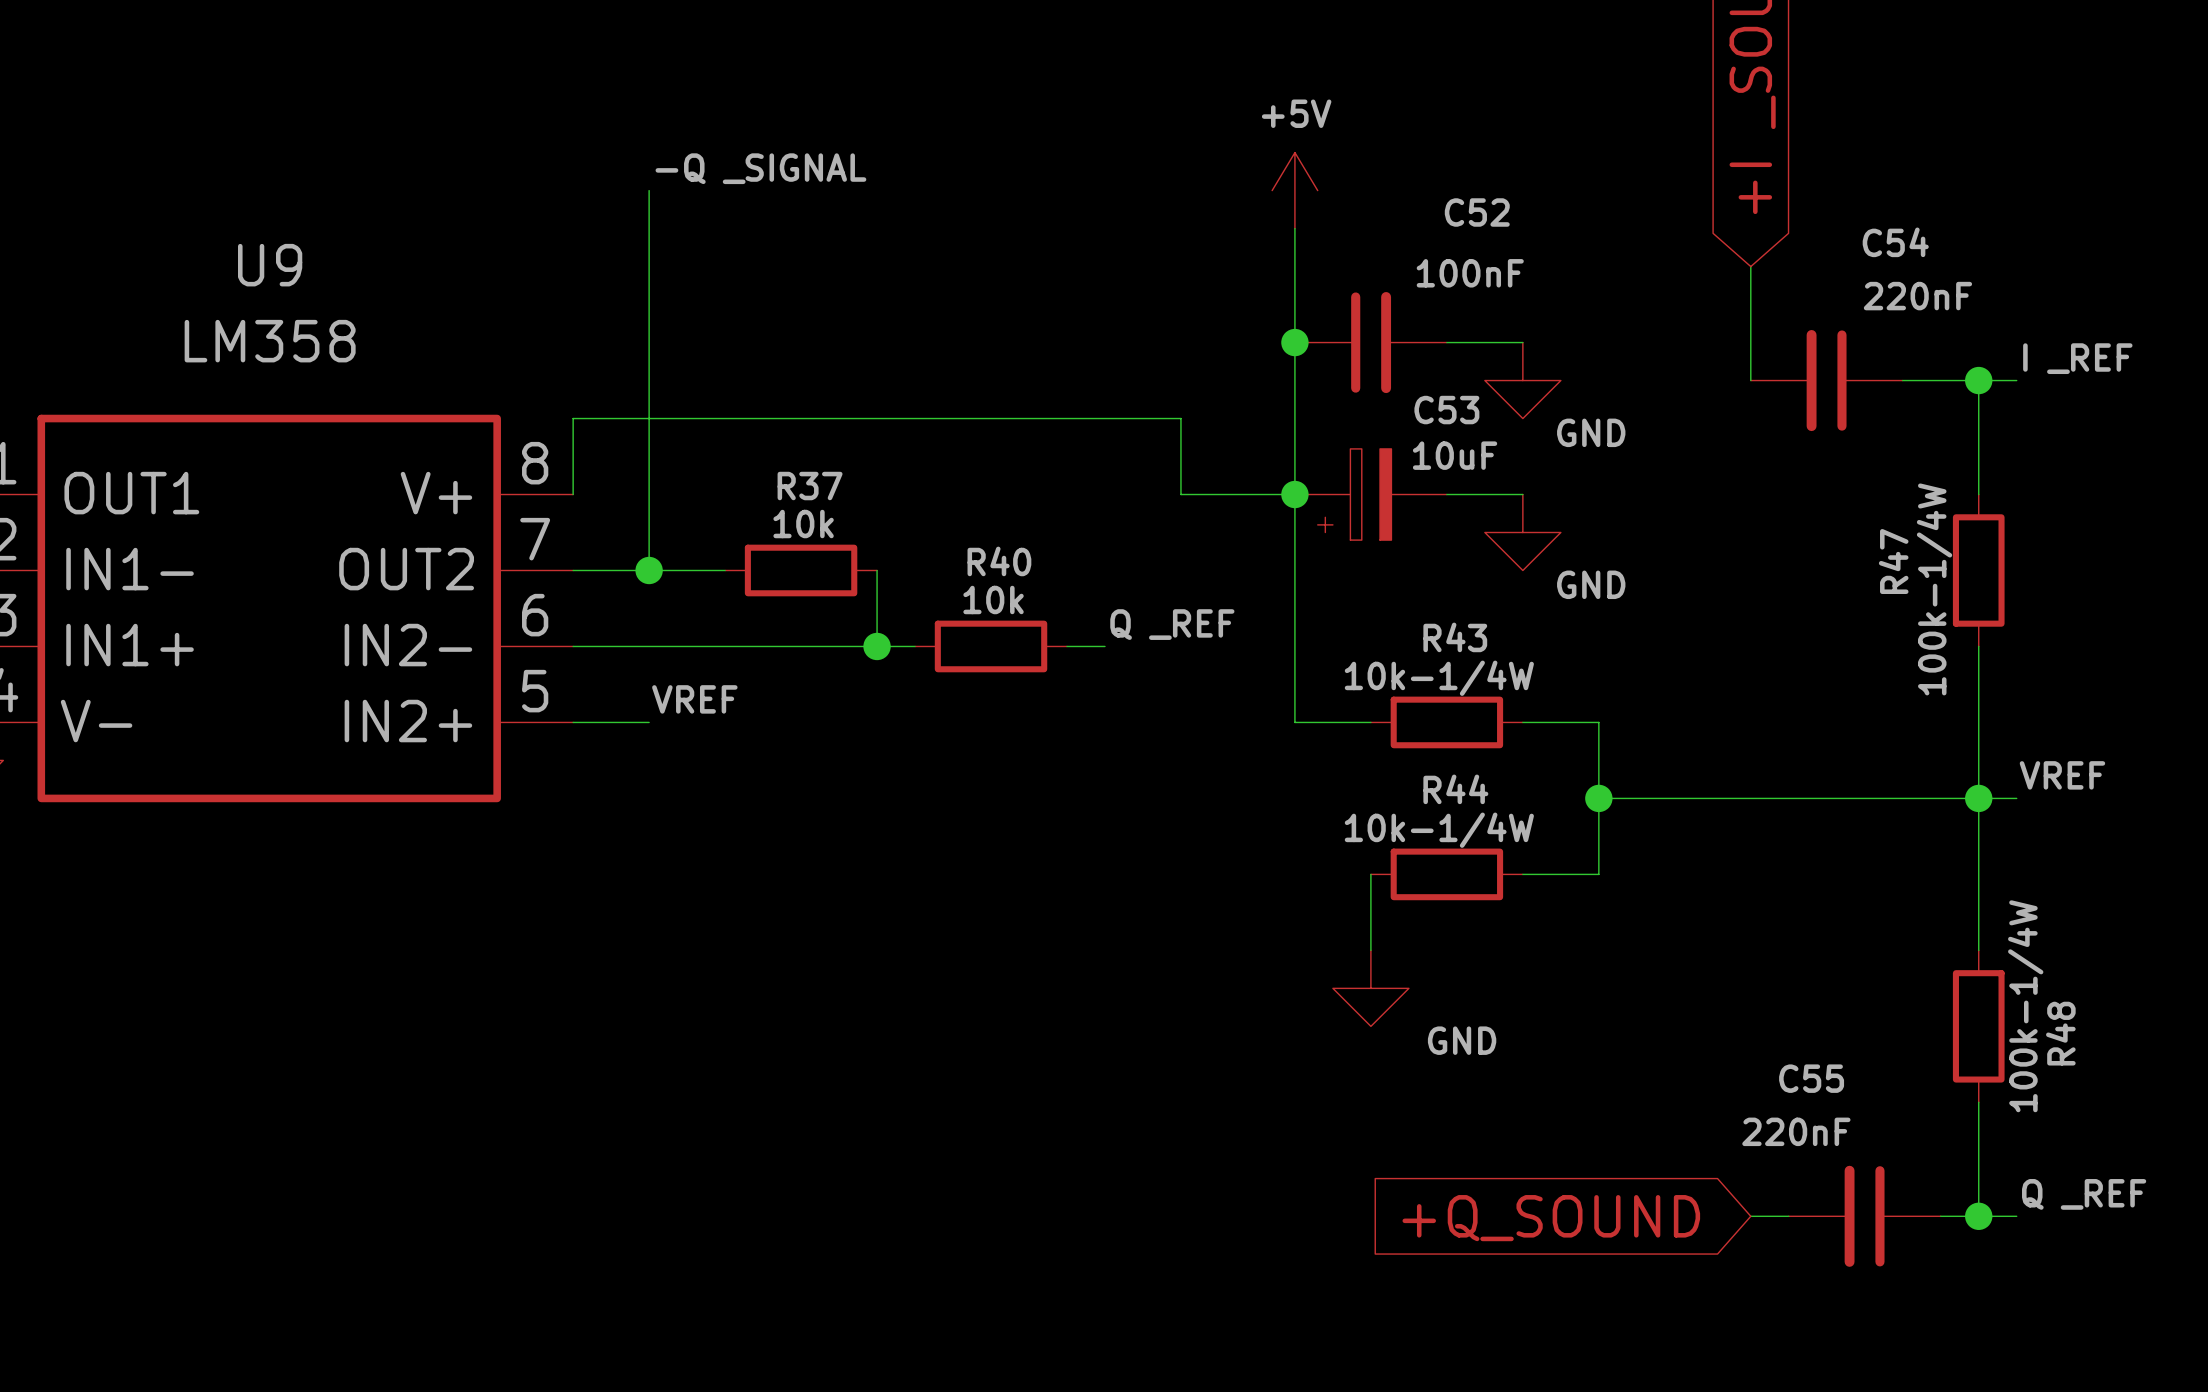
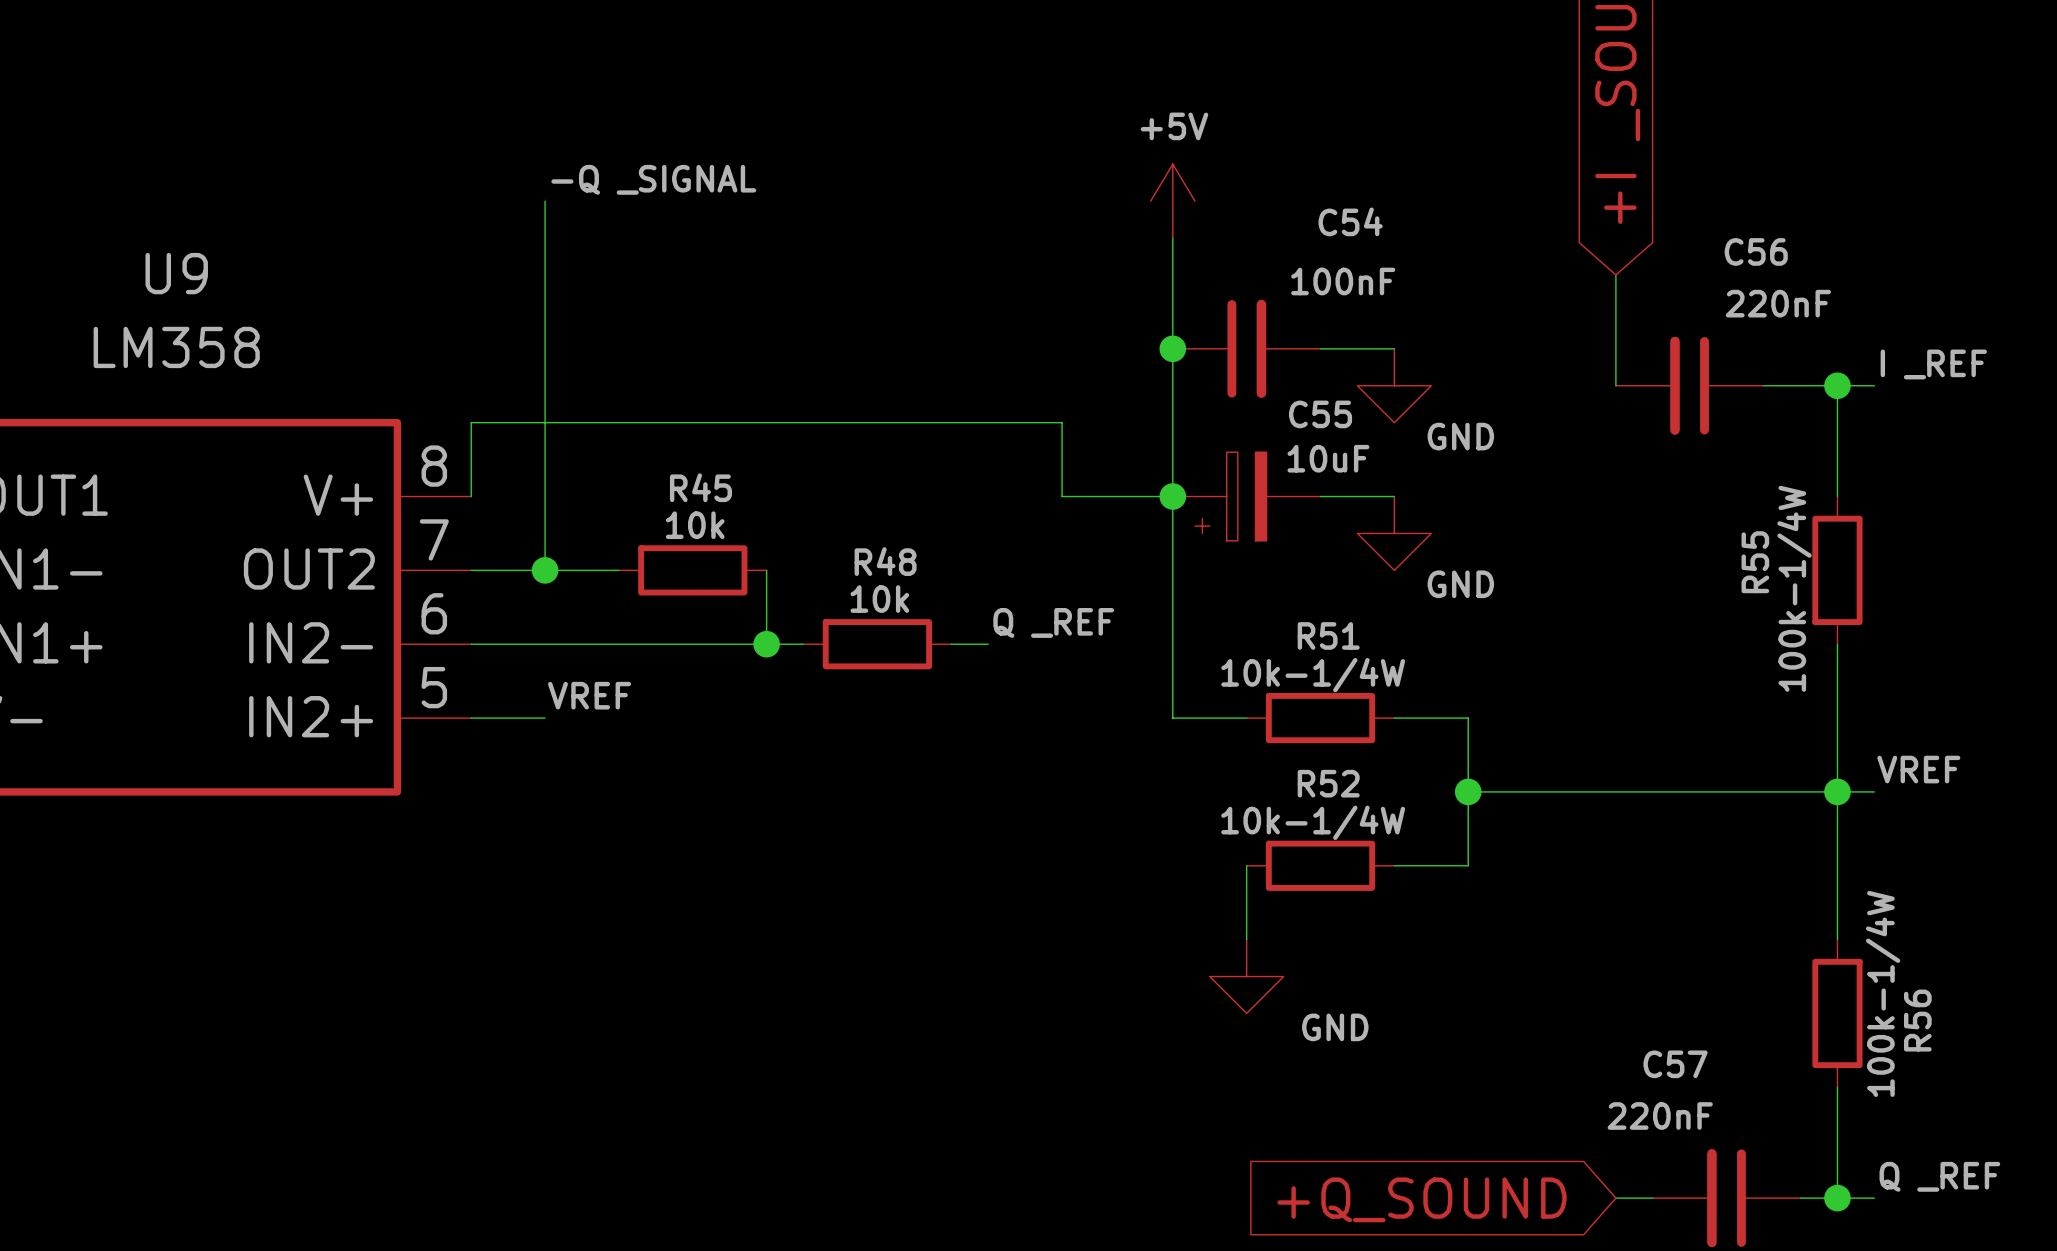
C52 name: C52 (1477, 212) -> C54 (1350, 221)
C54 name: C54 (1895, 242) -> C56 (1756, 251)
C53 name: C53 (1446, 410) -> C55 (1320, 414)
R37 name: R37 (810, 486) -> R45 (700, 487)
R40 name: R40 (999, 561) -> R48 (885, 561)
R47 name: R47 (1893, 561) -> R55 (1755, 562)
R43 name: R43 (1455, 637) -> R51 (1328, 635)
R44 name: R44 (1455, 789) -> R52 (1328, 783)
R48 name: R48 (2060, 1033) -> R56 (1917, 1020)
C55 name: C55 (1811, 1078) -> C57 (1675, 1064)

